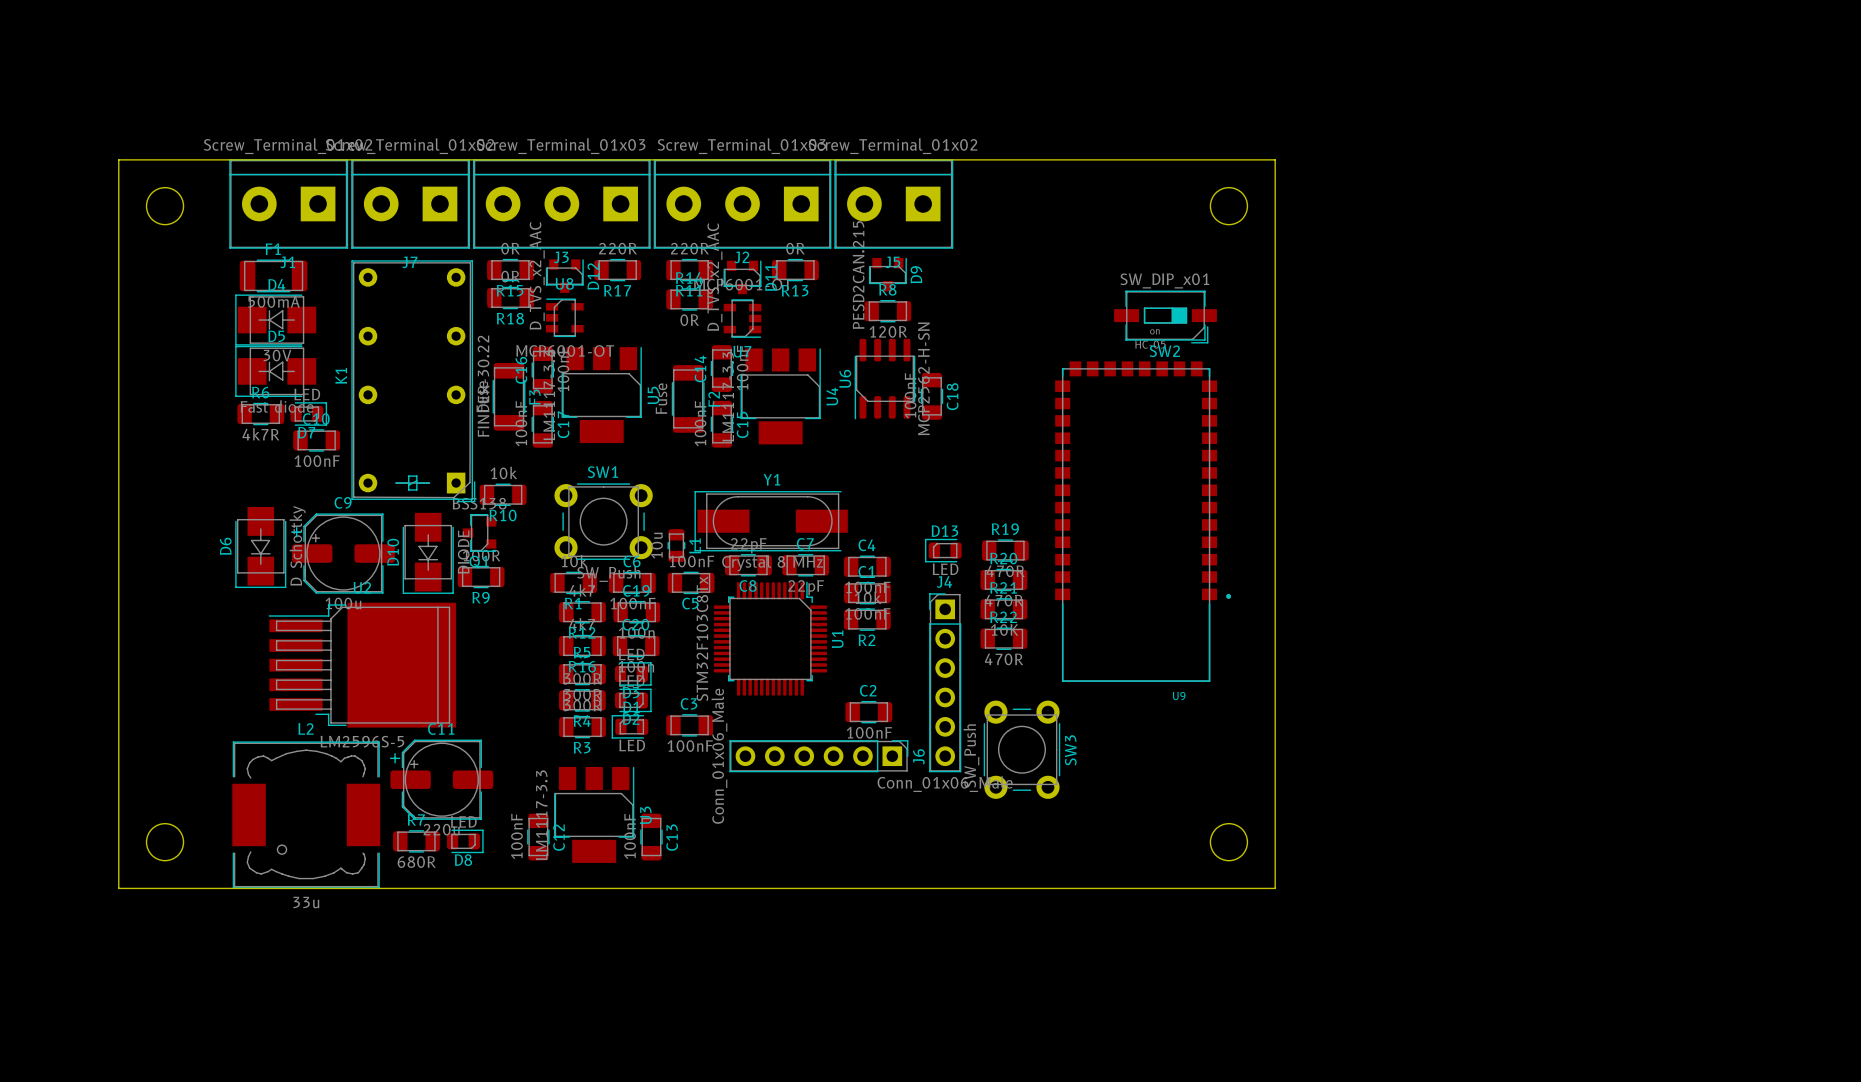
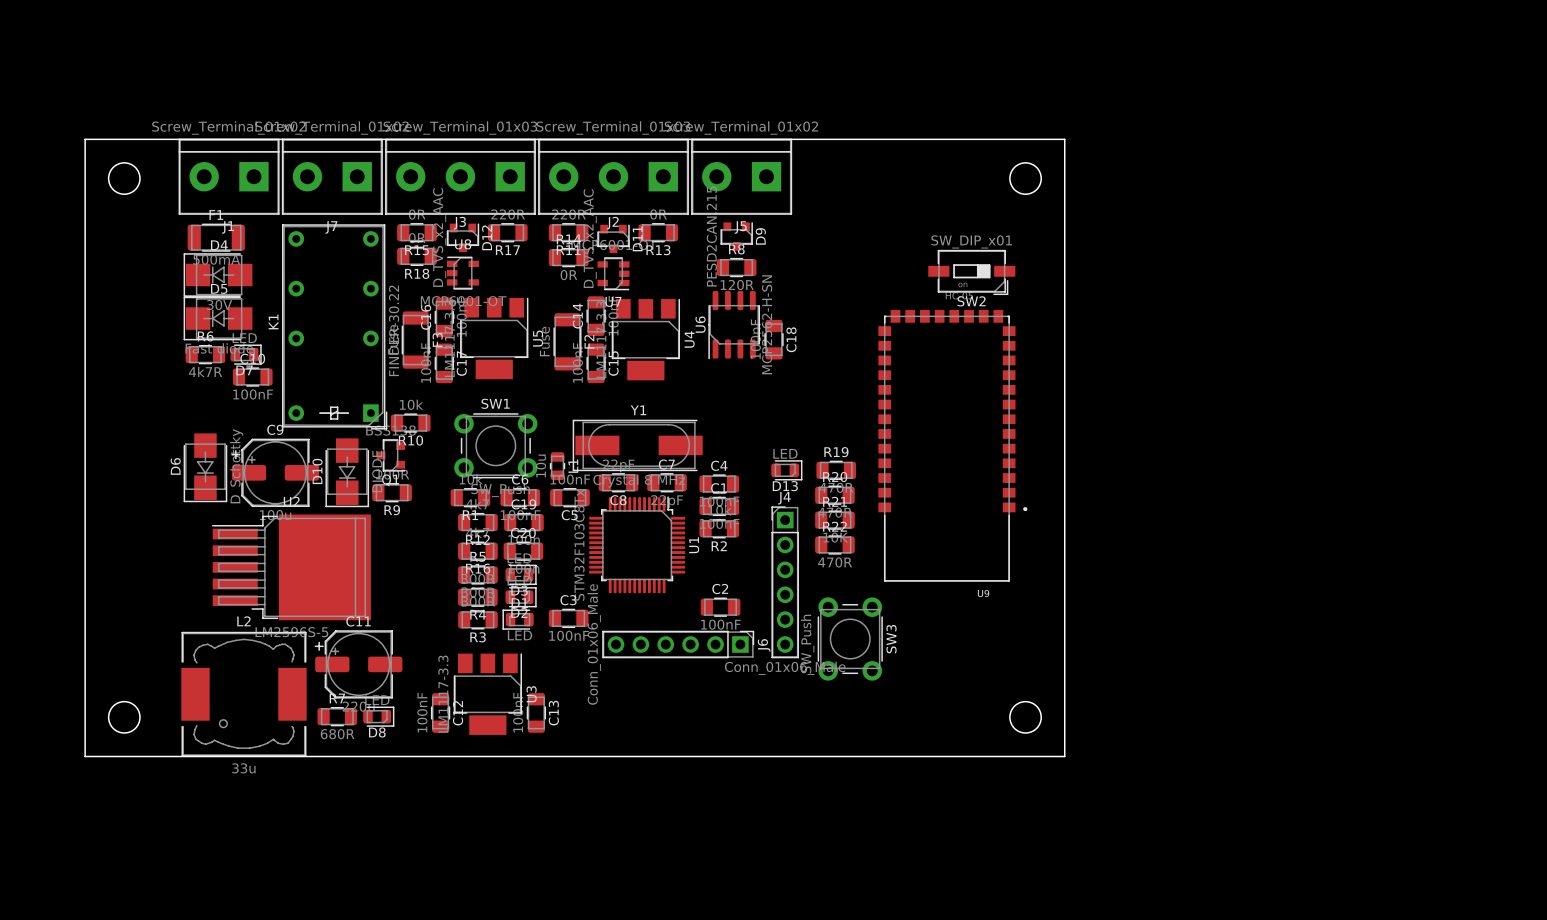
D13 rotation: 0° (943, 550) -> 180° (786, 470)

